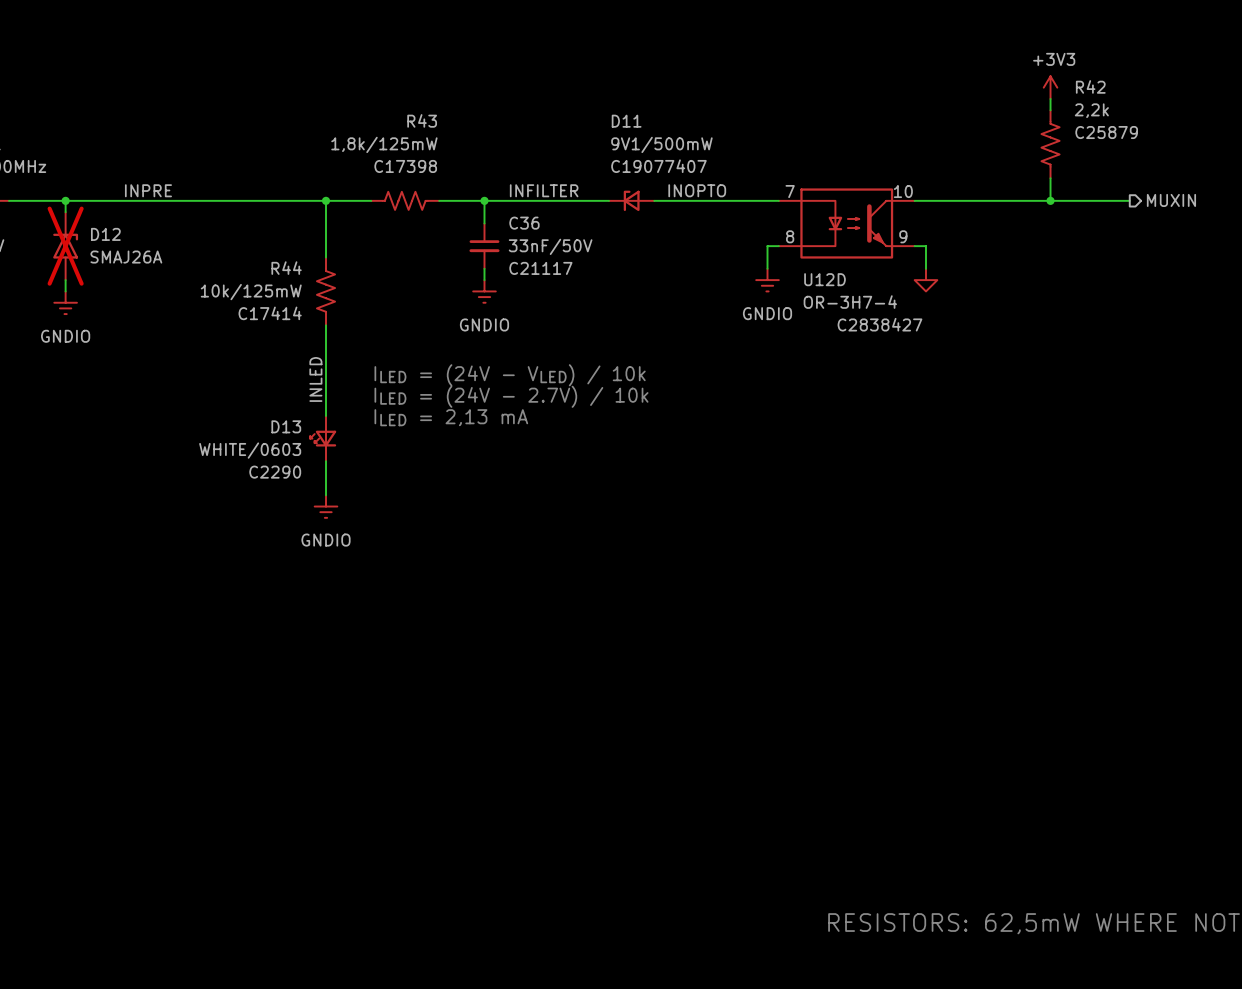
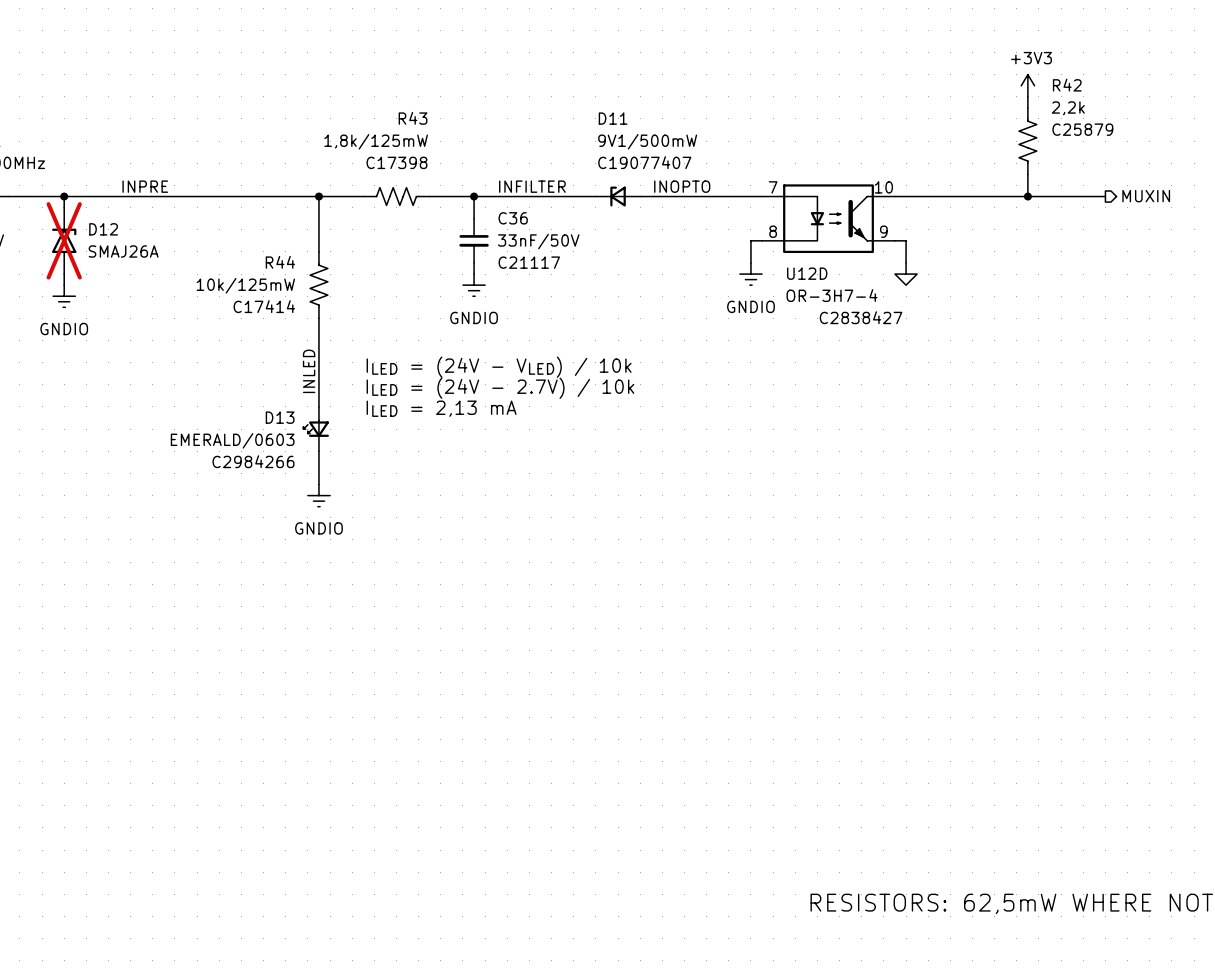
D13 value: WHITE/0603 (250, 450) -> EMERALD/0603 (232, 440)
D13 text: C2290 (275, 472) -> C2984266 (253, 461)

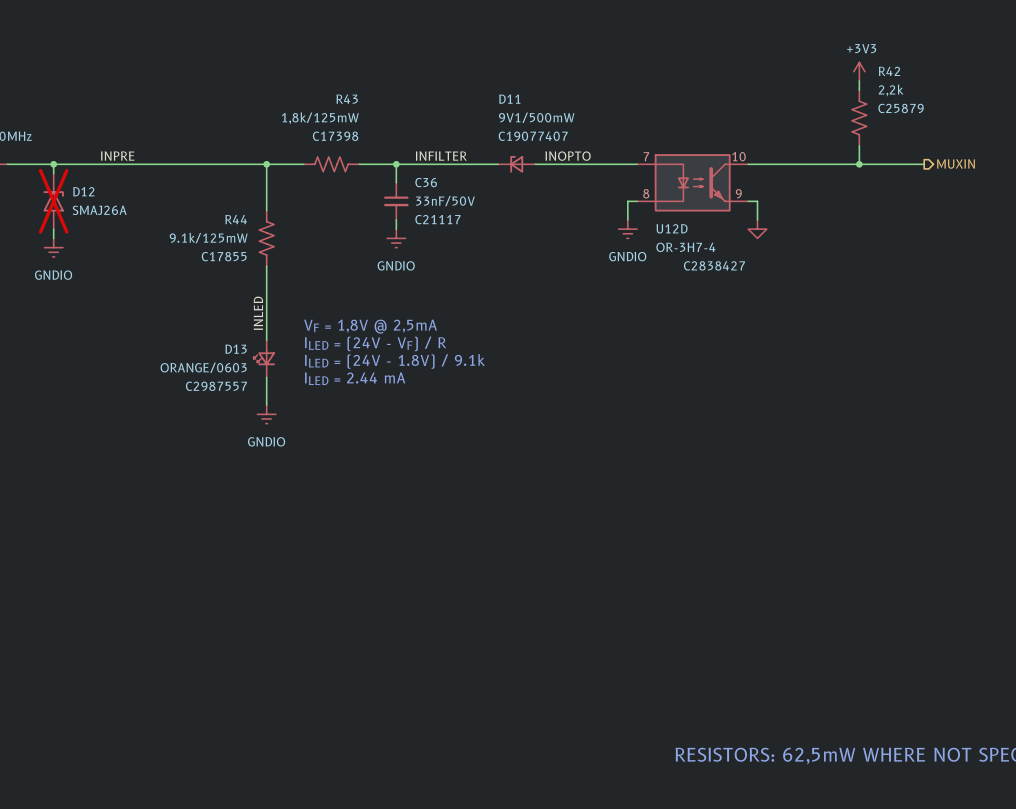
R44 value: 10k/125mW (245, 285) -> 9.1k/125mW (208, 238)
R44 text: C17414 (264, 306) -> C17855 (224, 256)
text: ILED = (24V - VLED) / 10k (499, 367) -> none
text: ILED = (24V - 2.7V) / 10k (500, 388) -> VF = 1,8V @ 2,5mA (370, 326)
text: ILED = 2,13 mA (441, 408) -> ILED = (24V - VF) / R (375, 343)
text: none -> ILED = (24V - 1.8V) / 9.1k (394, 361)
D13 value: EMERALD/0603 (232, 440) -> ORANGE/0603 (203, 367)
text: none -> ILED = 2.44 mA (355, 378)
D13 text: C2984266 (253, 461) -> C2987557 (216, 386)

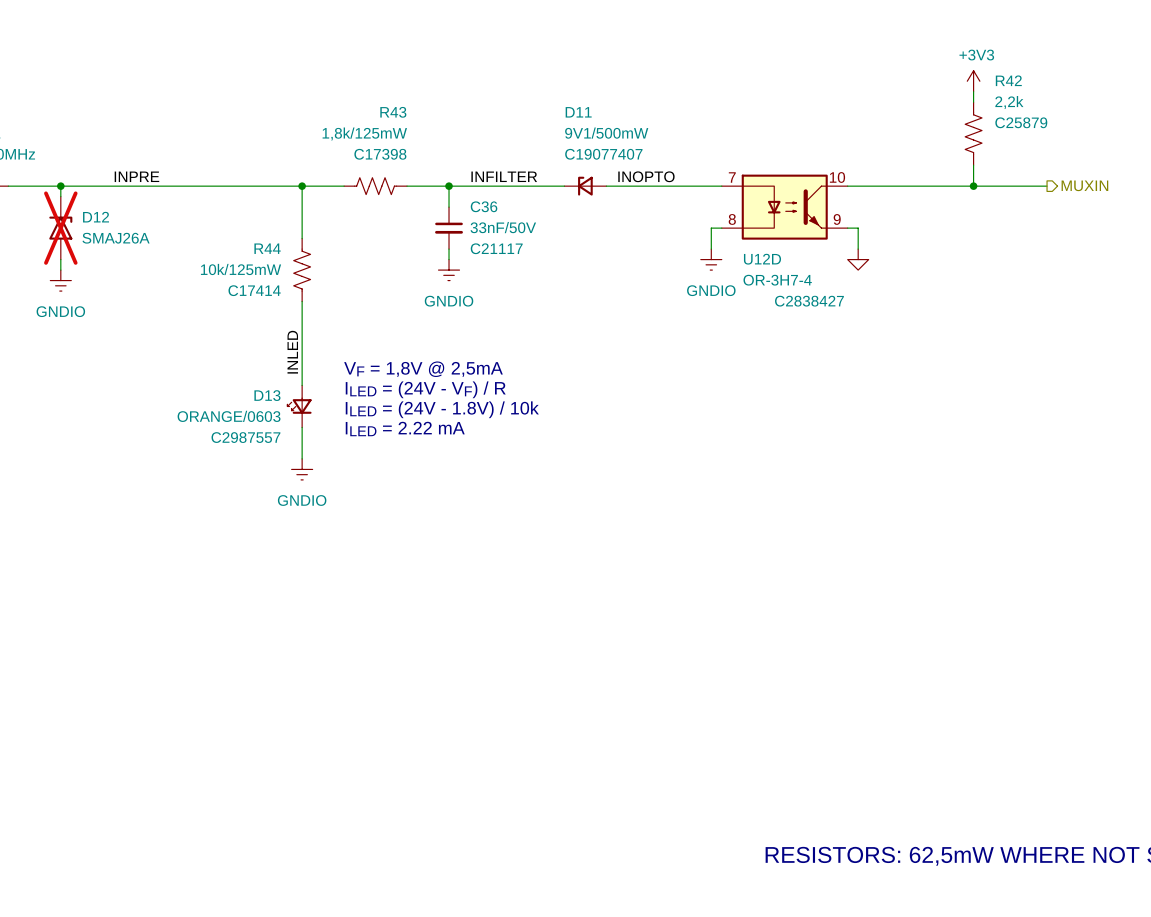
R44 value: 9.1k/125mW (208, 238) -> 10k/125mW (241, 269)
R44 text: C17855 (224, 256) -> C17414 (254, 290)
text: ILED = (24V - 1.8V) / 9.1k (394, 361) -> ILED = (24V - 1.8V) / 10k (442, 409)
text: ILED = 2.44 mA (355, 378) -> ILED = 2.22 mA (405, 429)

